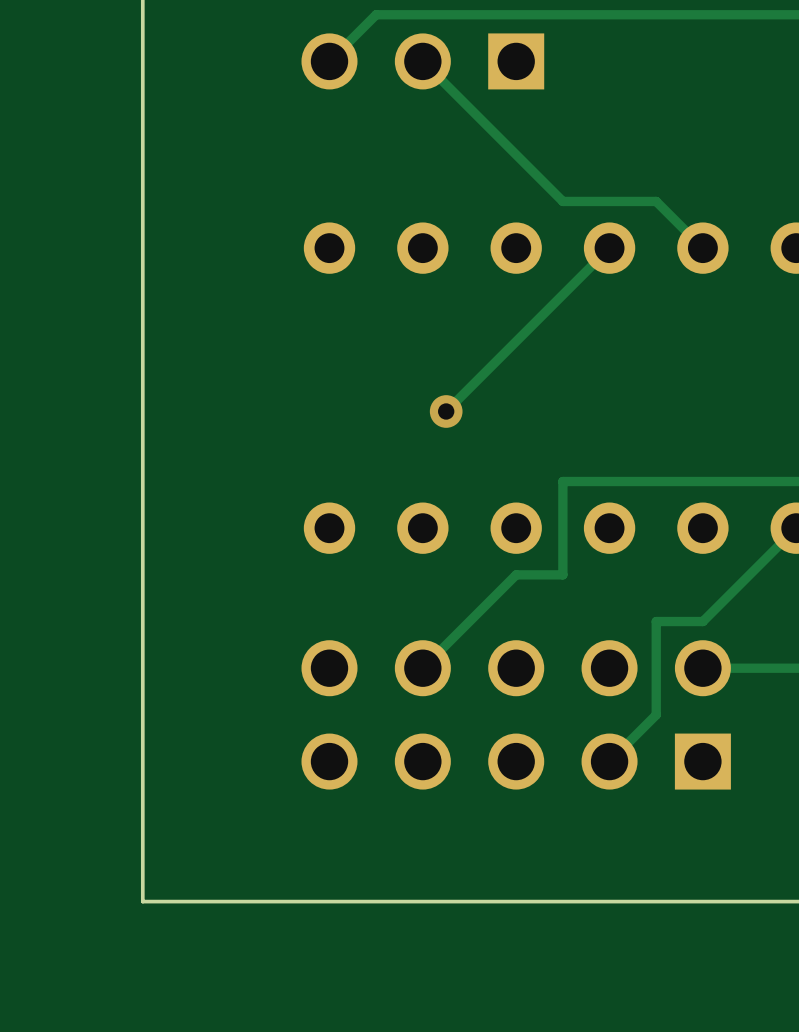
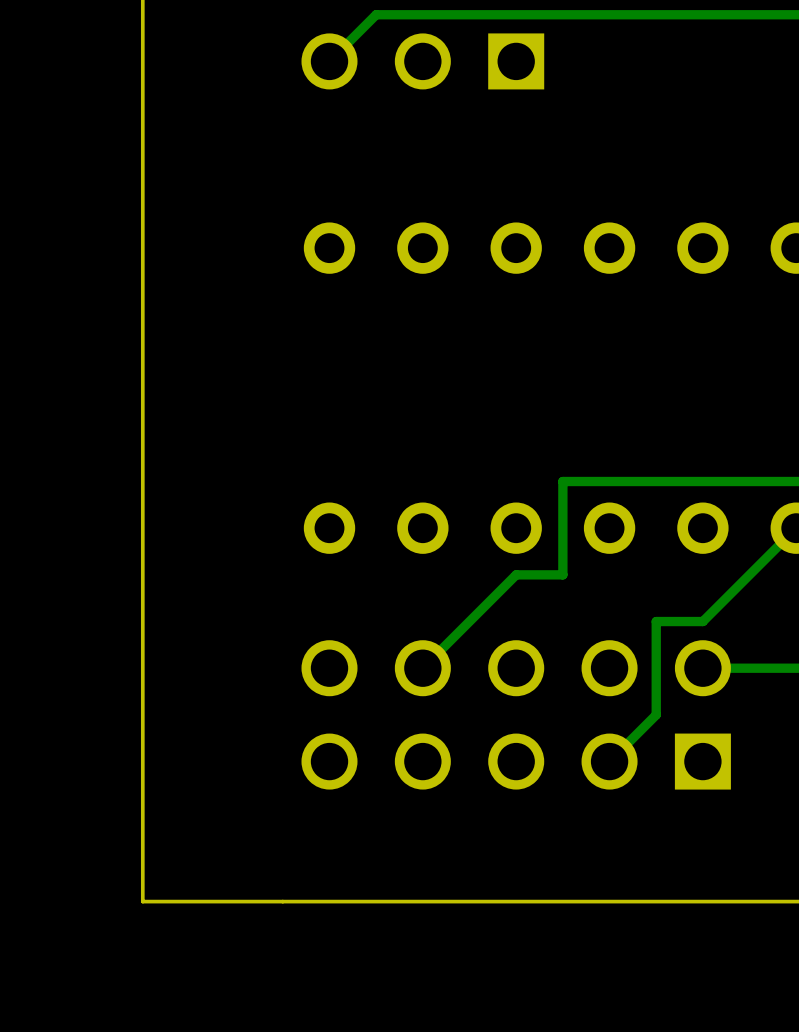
track: (422, 61) (562, 201) (656, 201) (702, 248) -> none
track: (609, 248) (446, 411) -> none
via: (446, 411) -> none

